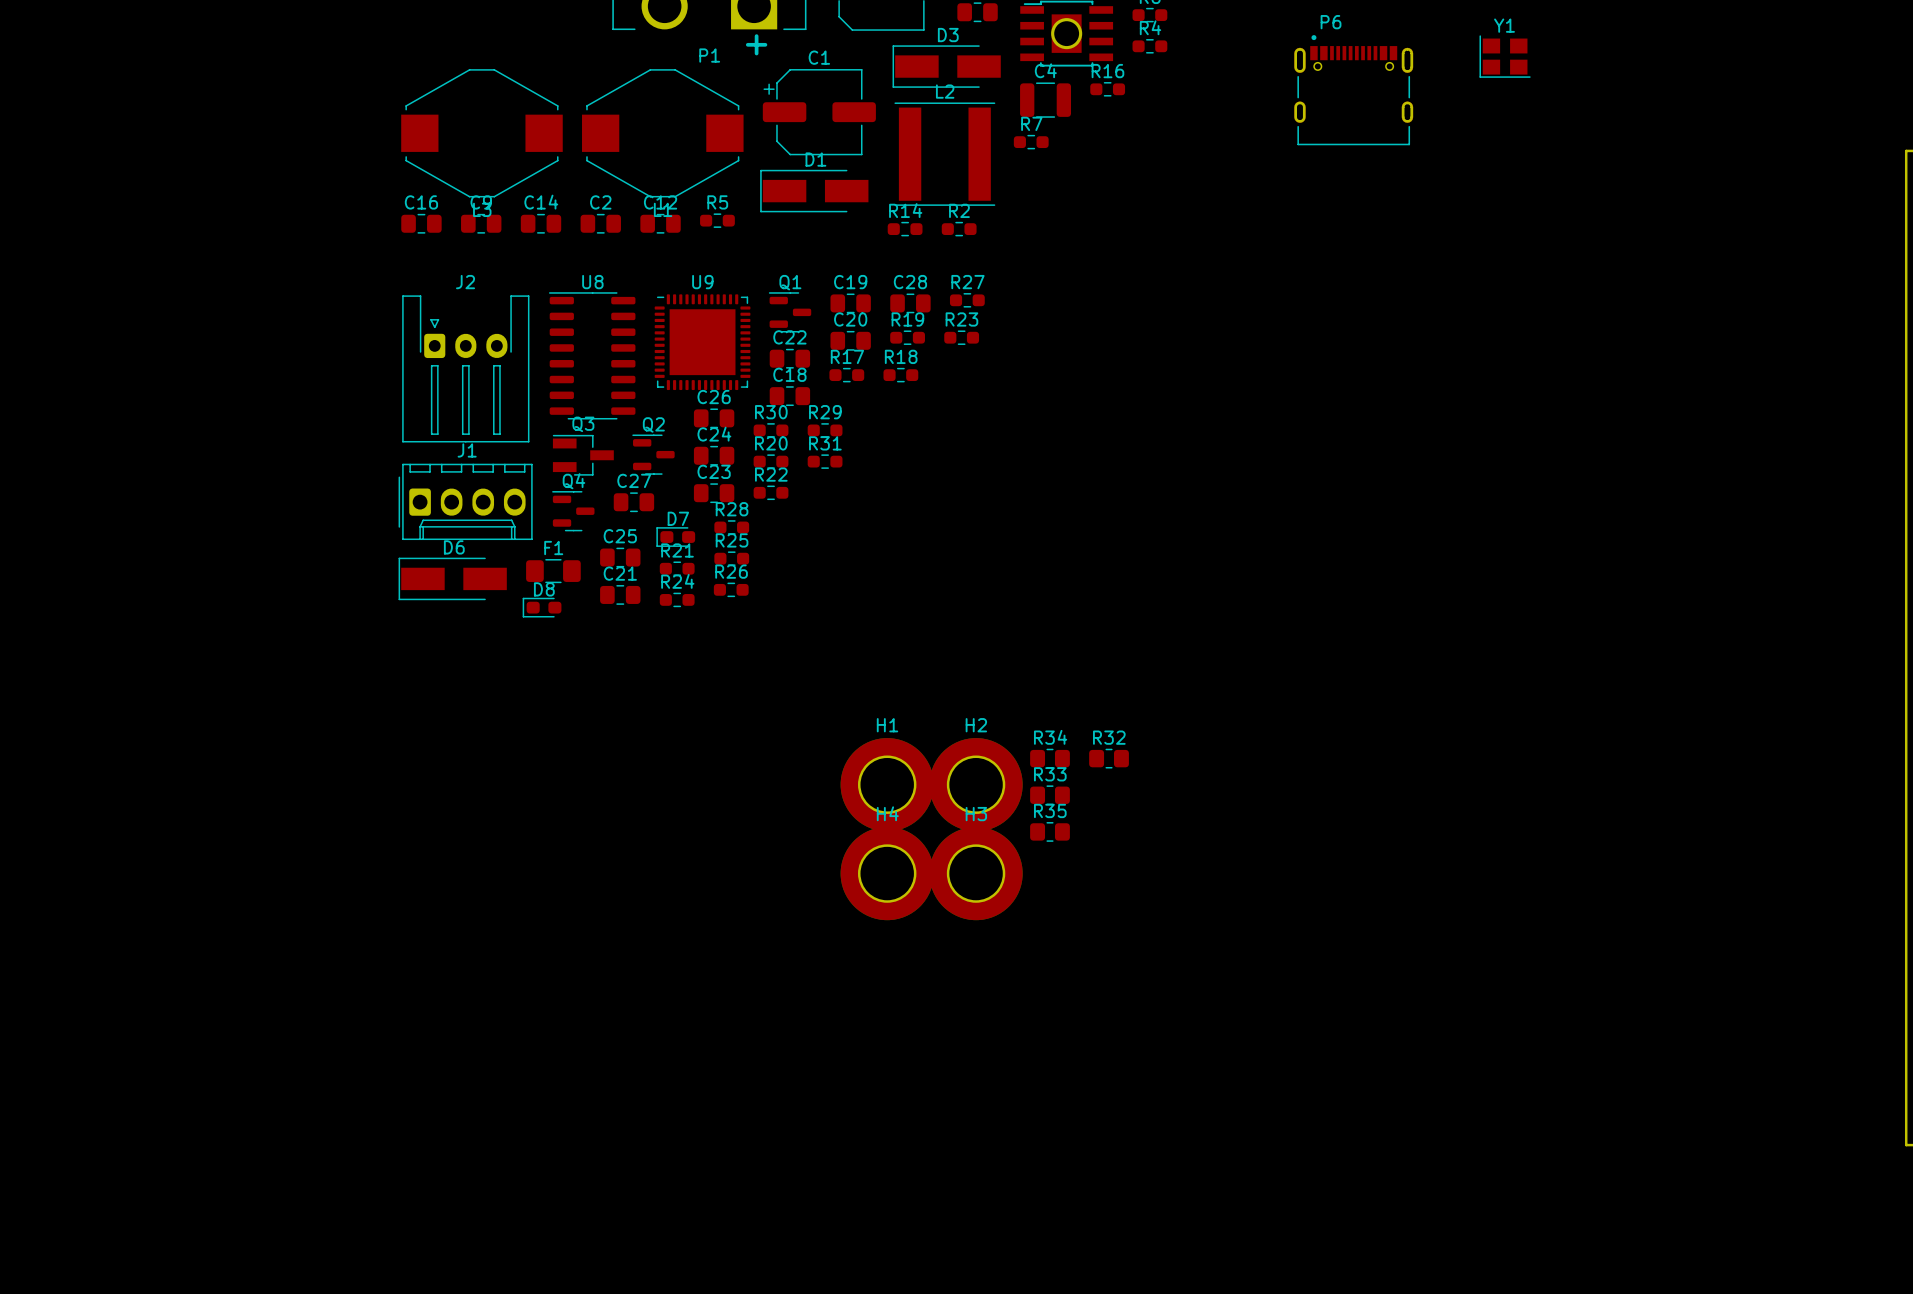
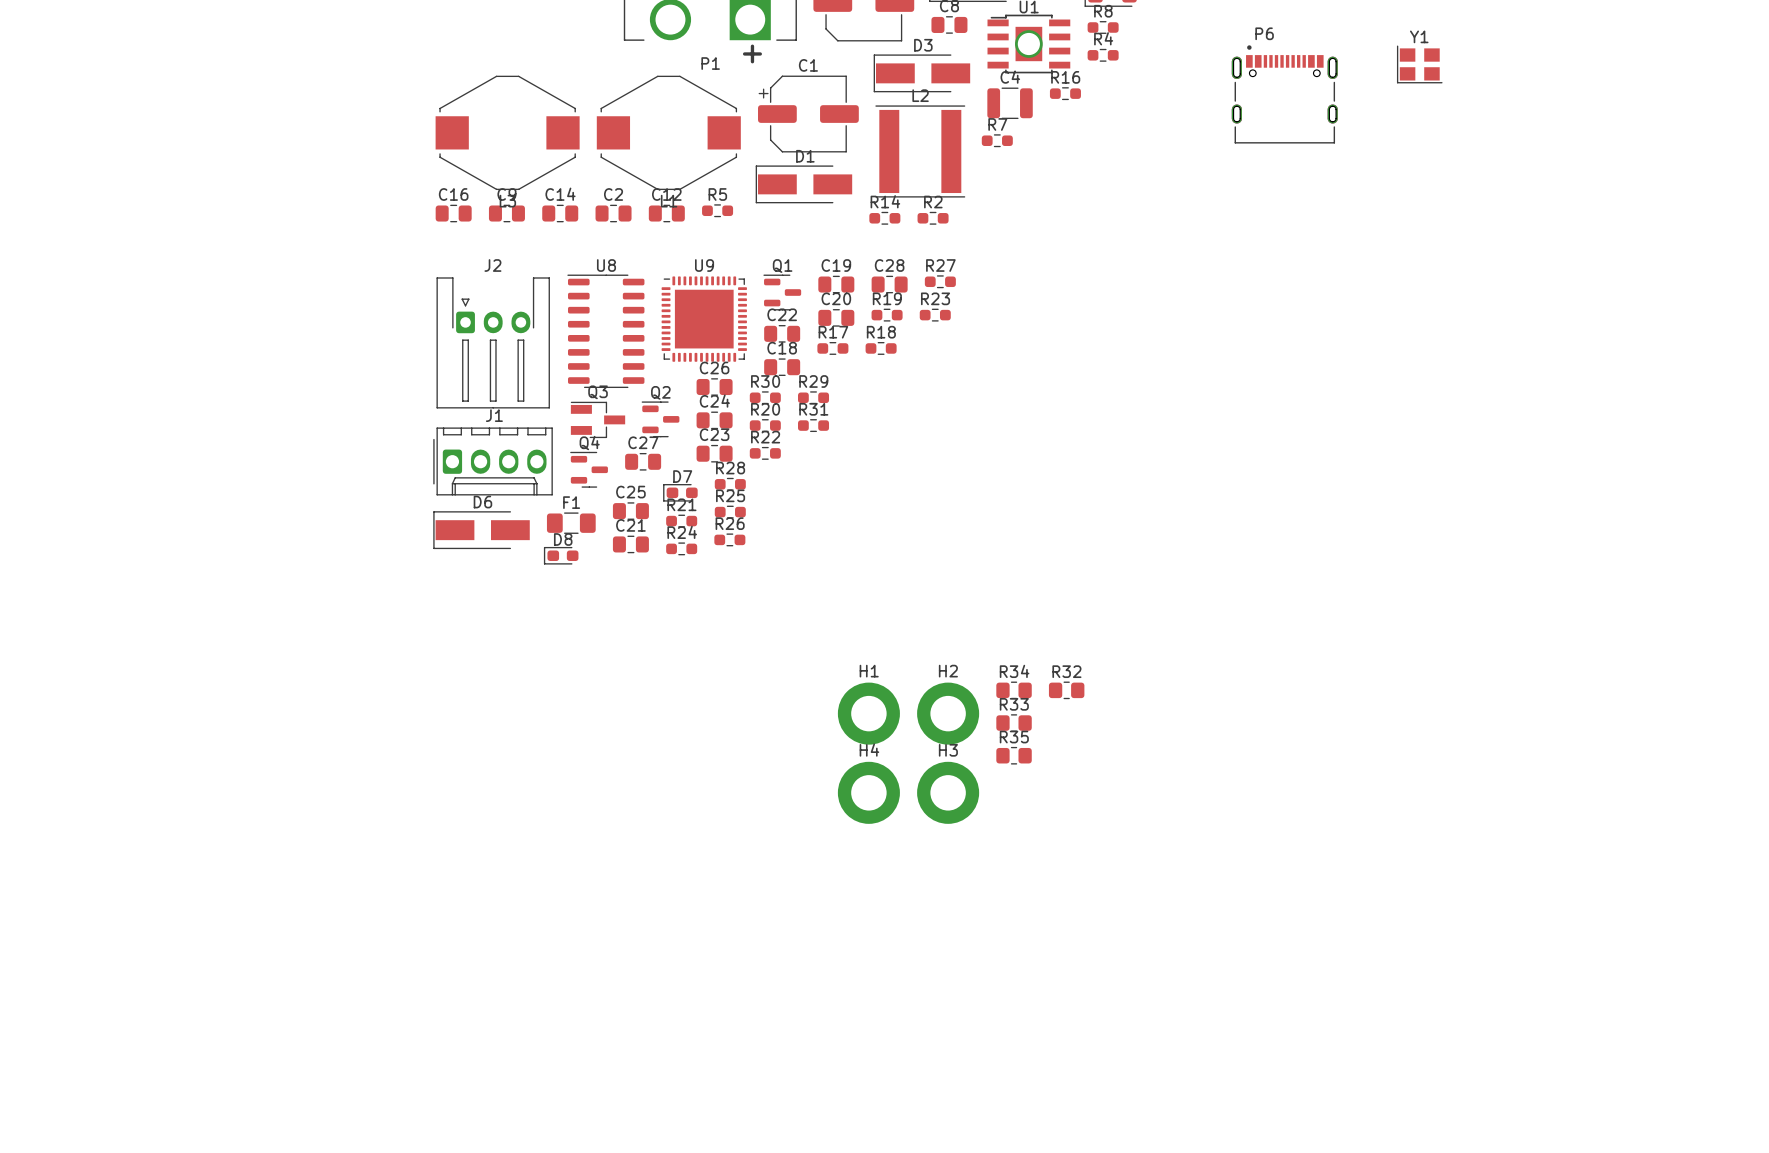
H1 footprint: [840, 738, 934, 832] -> [837, 682, 900, 745]
H2 footprint: [929, 738, 1023, 832] -> [917, 682, 980, 745]
H4 footprint: [840, 826, 934, 921] -> [837, 761, 900, 824]
H3 footprint: [929, 826, 1023, 921] -> [917, 761, 980, 824]

